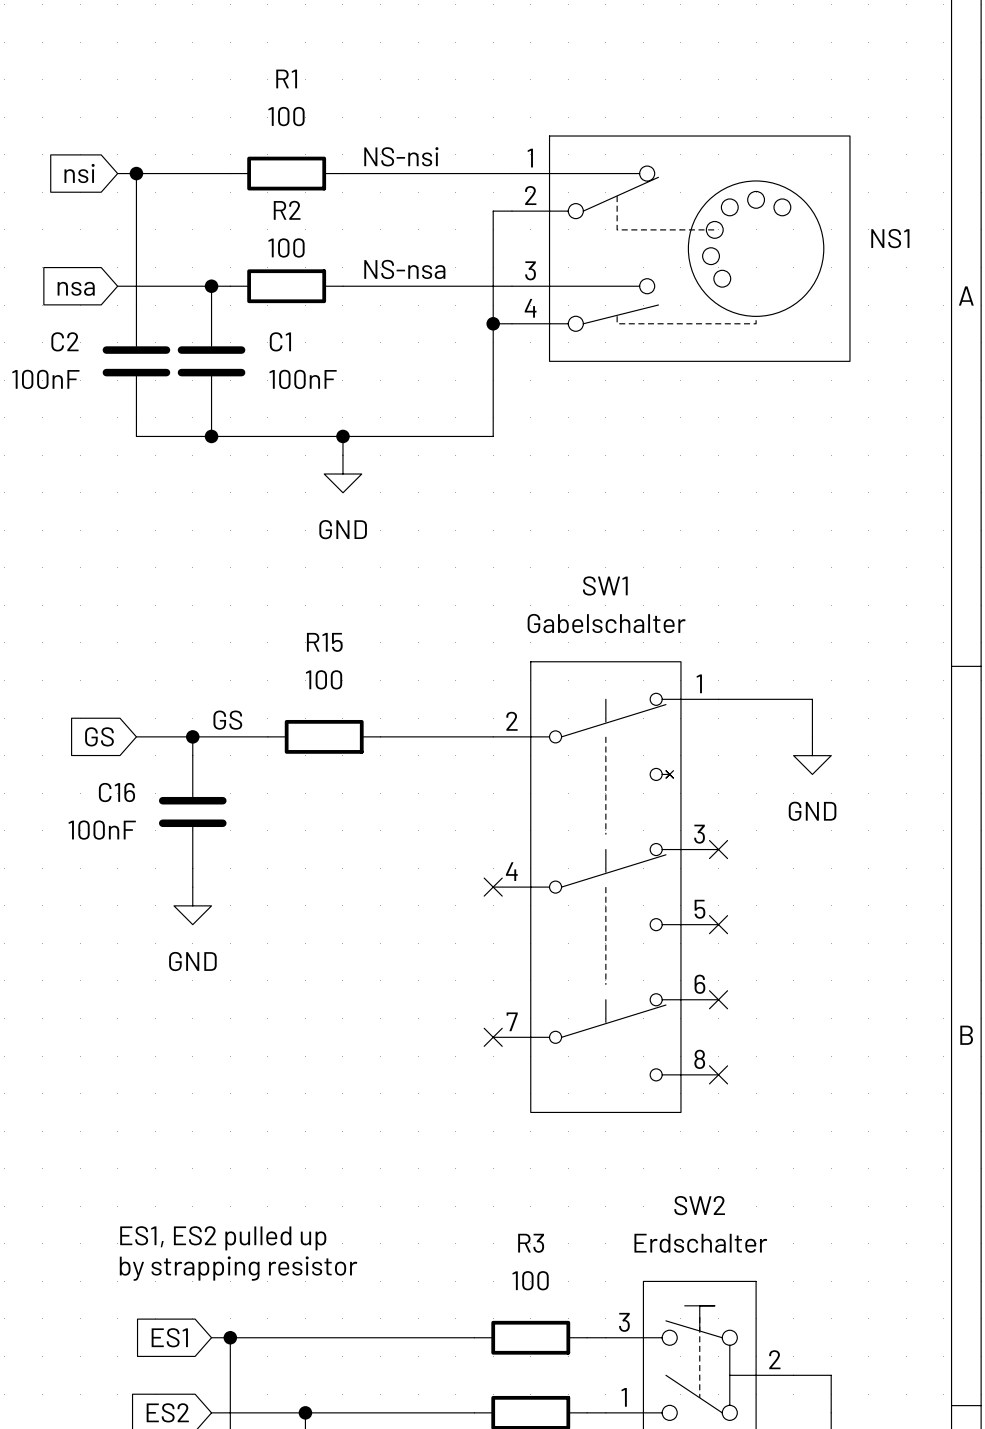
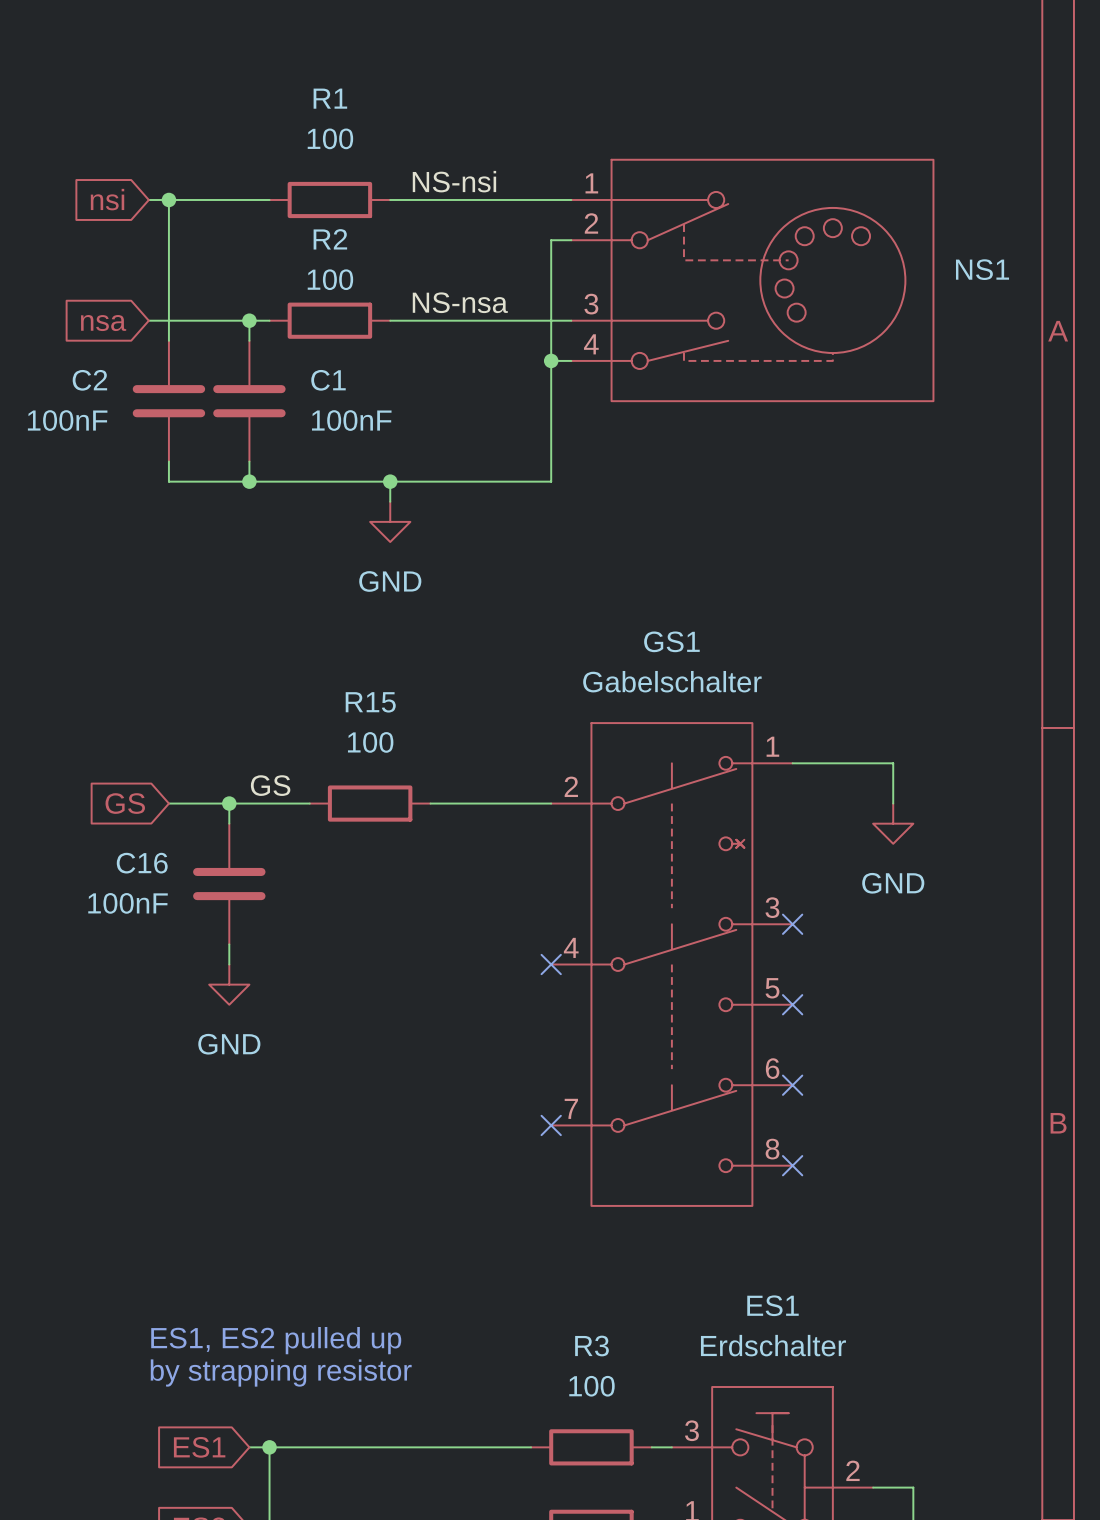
SW1 name: SW1 (605, 585) -> GS1 (671, 641)
SW2 name: SW2 (699, 1205) -> ES1 (772, 1305)

